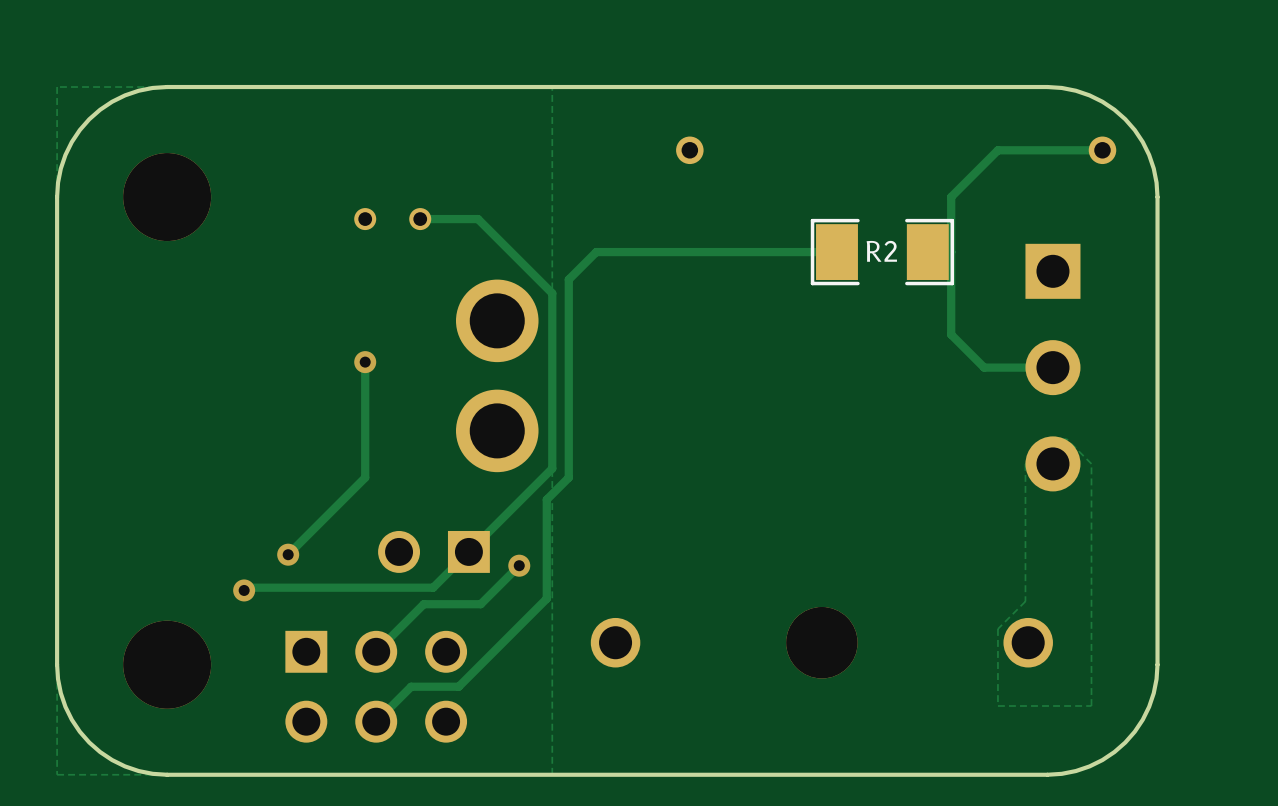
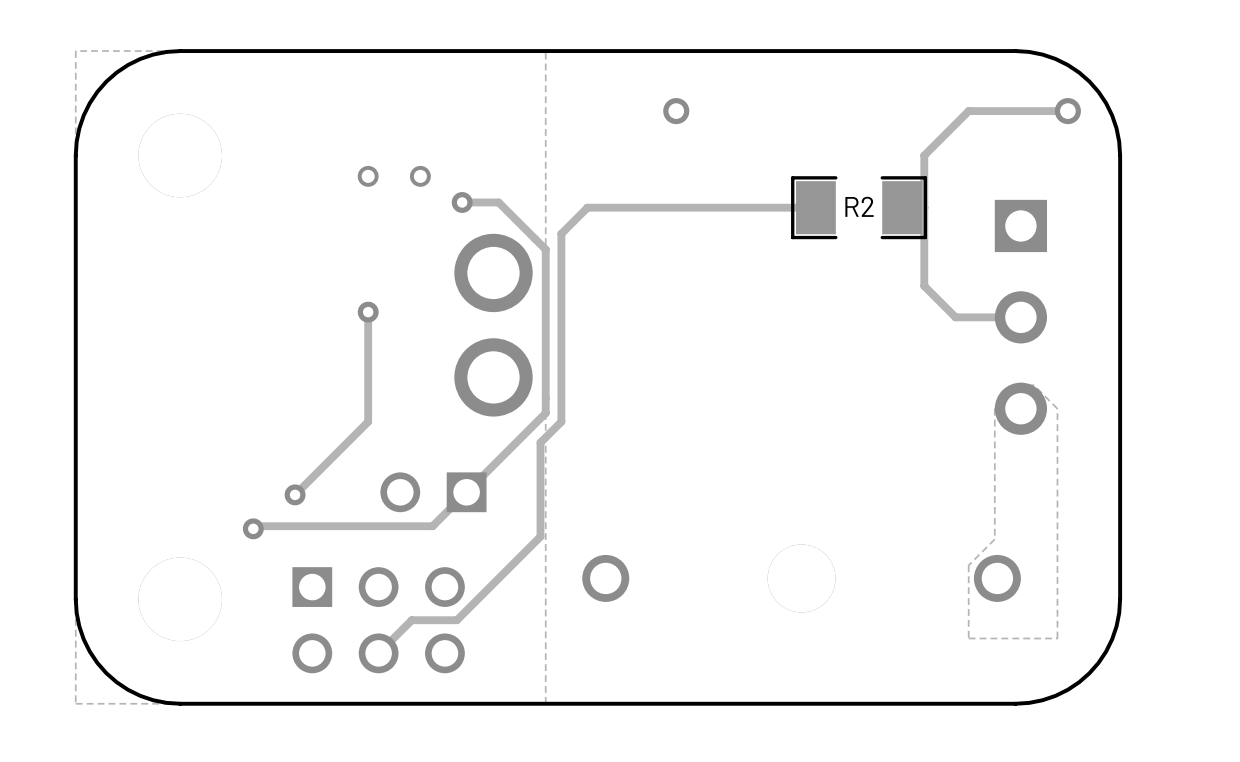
track: (420, 219) (478, 219) (552, 293) (552, 296) -> (462, 202) (498, 202) (545, 249)
via: none -> (462, 202)
track: (519, 565) (480, 604) (423, 604) (376, 651) -> none
via: (519, 565) -> none

